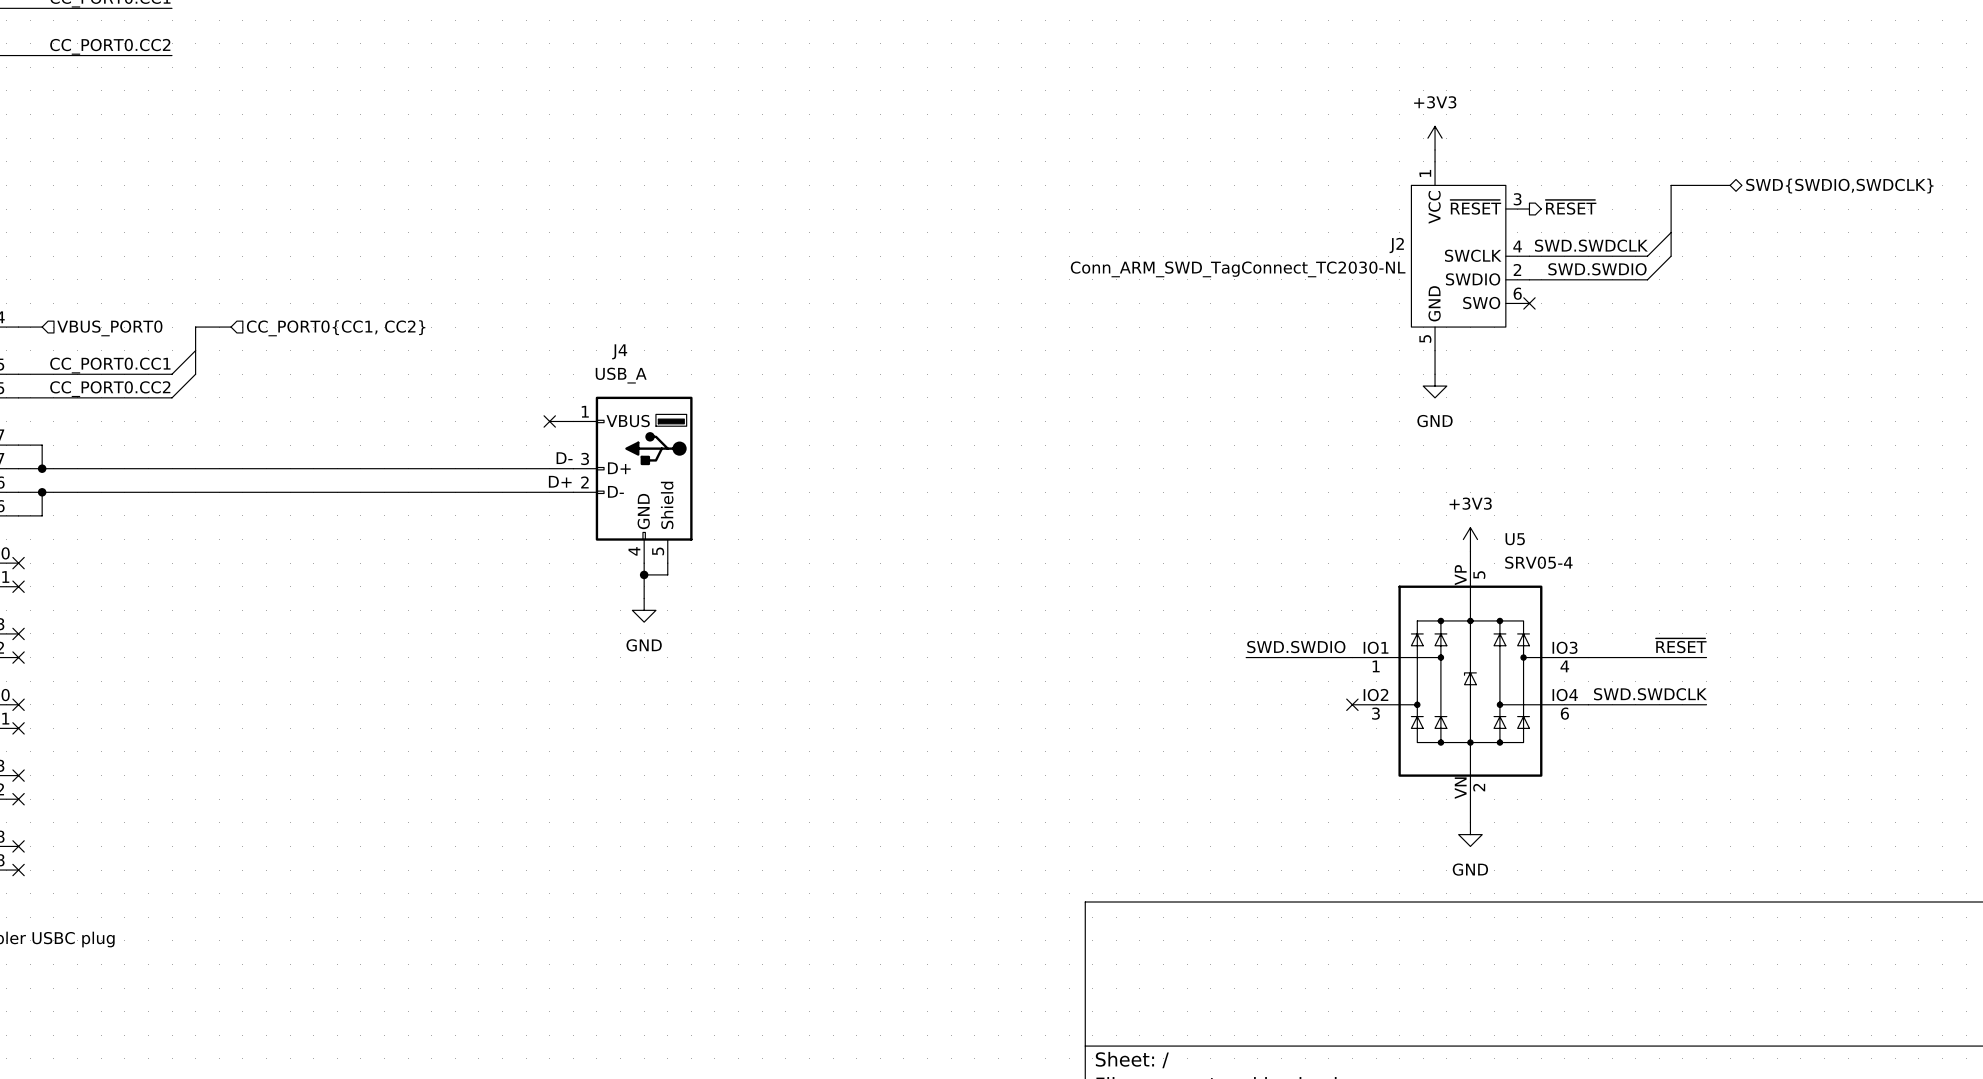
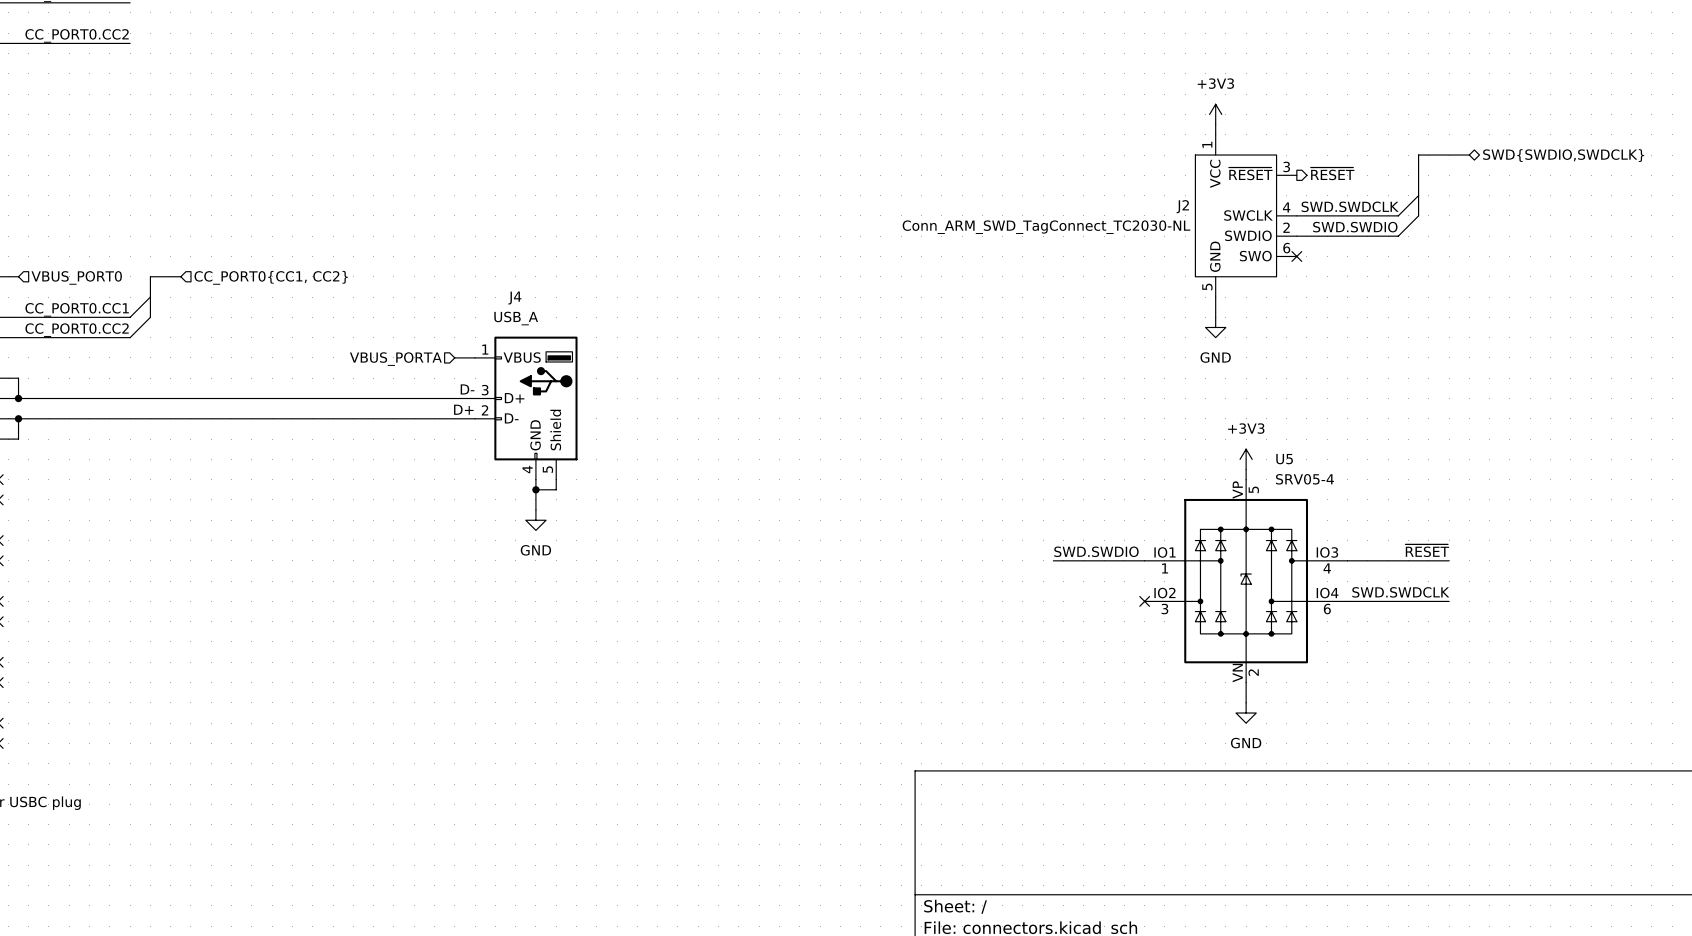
no-connect mark: (549, 421) -> none
hierarchical label: none -> VBUS_PORTA (395, 359)

